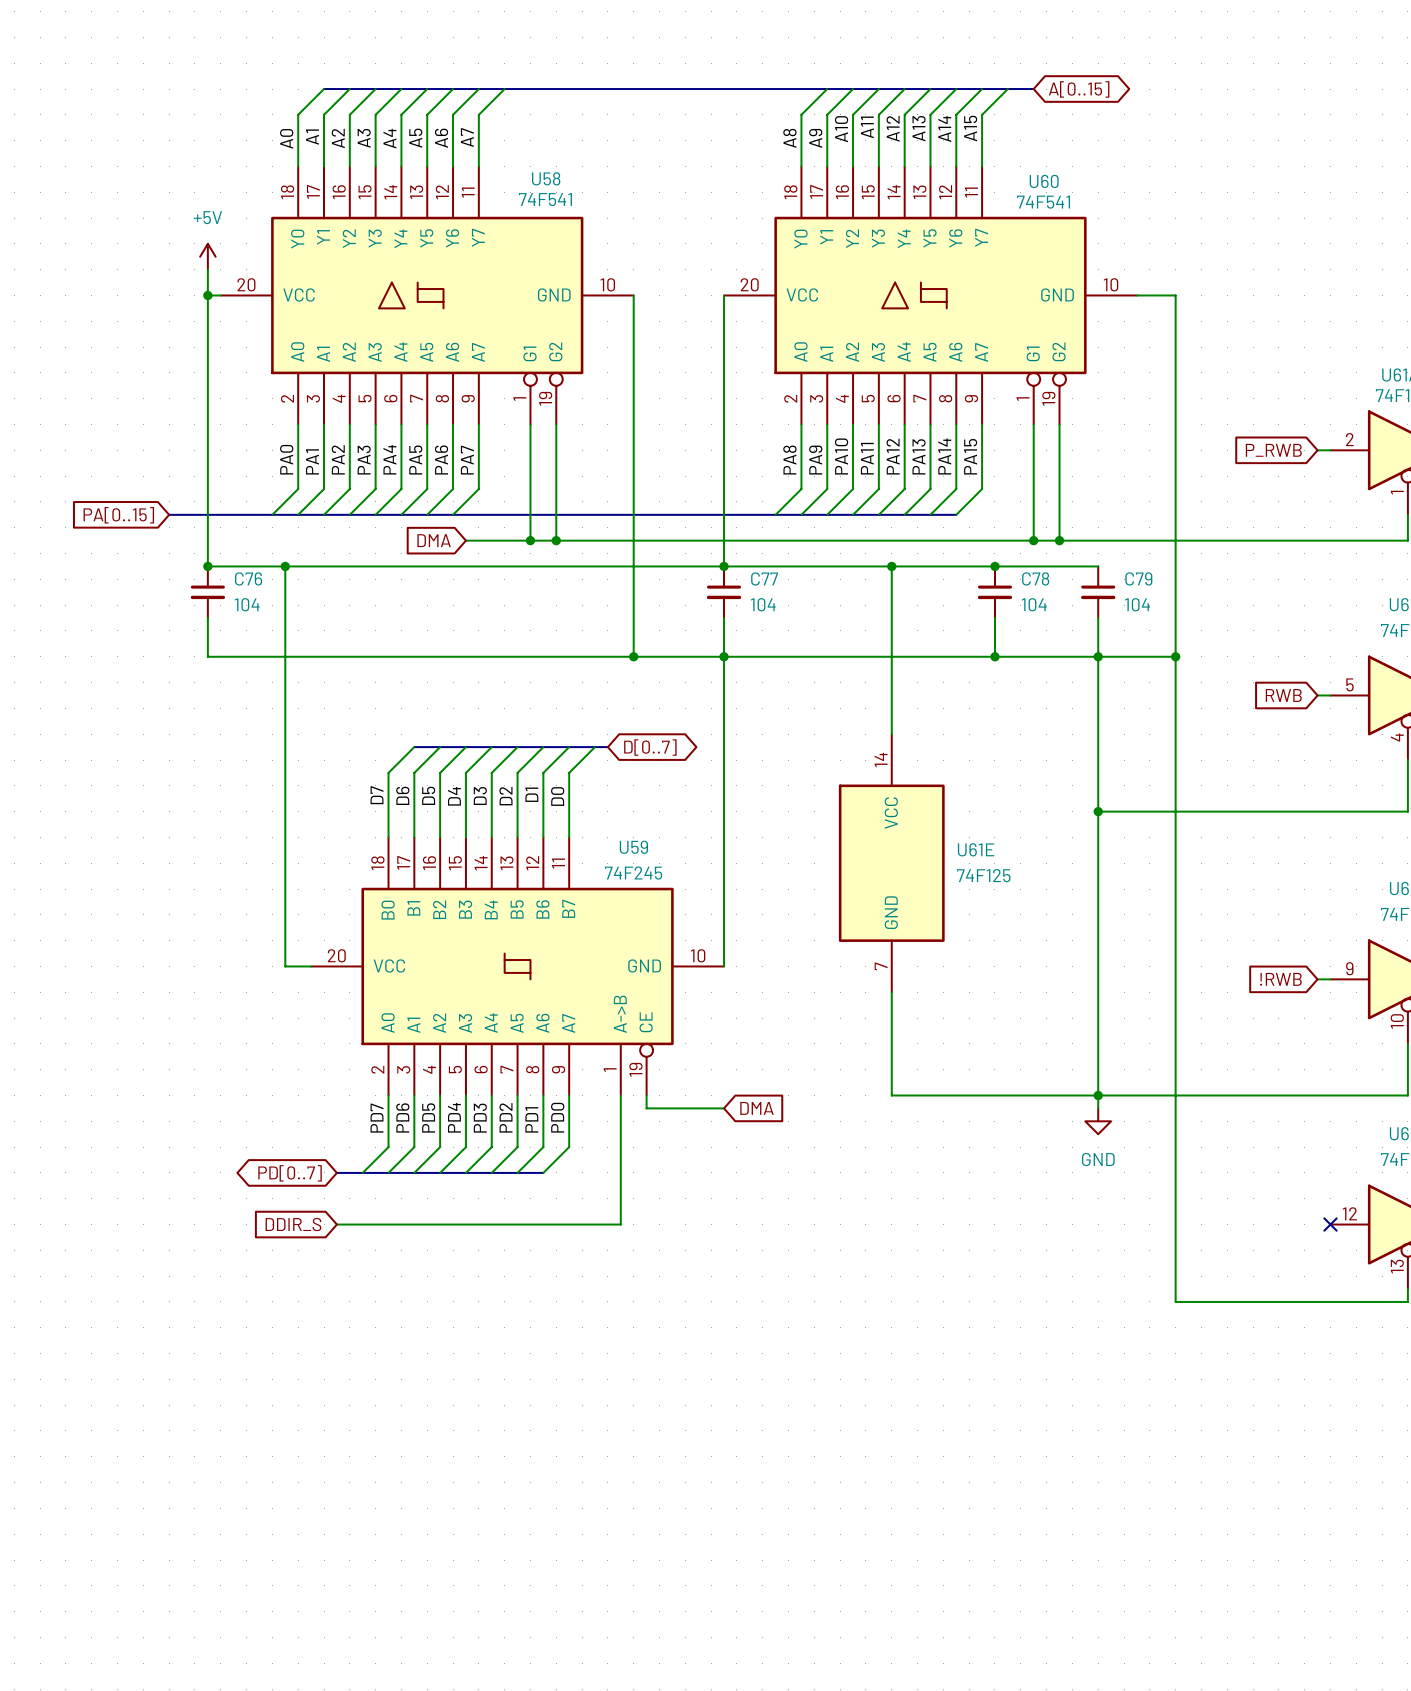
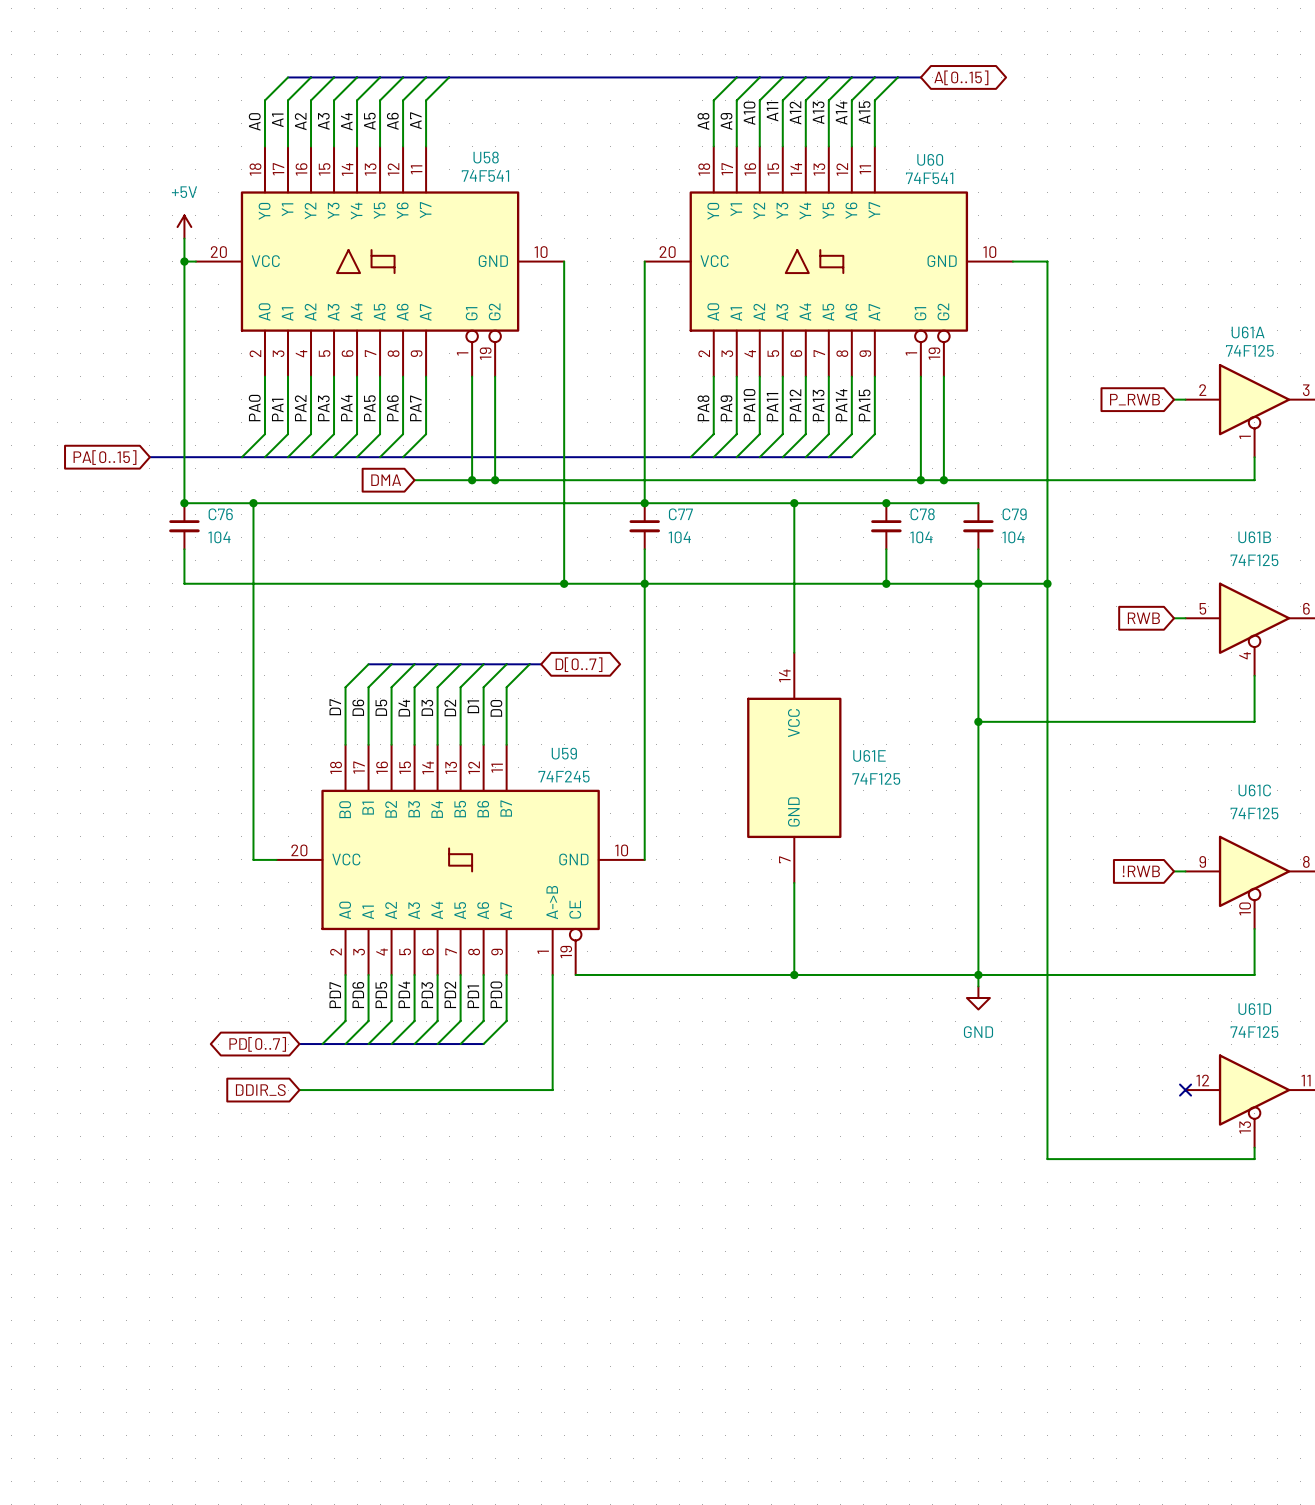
wire: (646, 1095) (646, 1108) (724, 1108) -> (575, 974) (794, 974)
junction: none -> (794, 974)
global label: DMA (756, 1108) -> none

